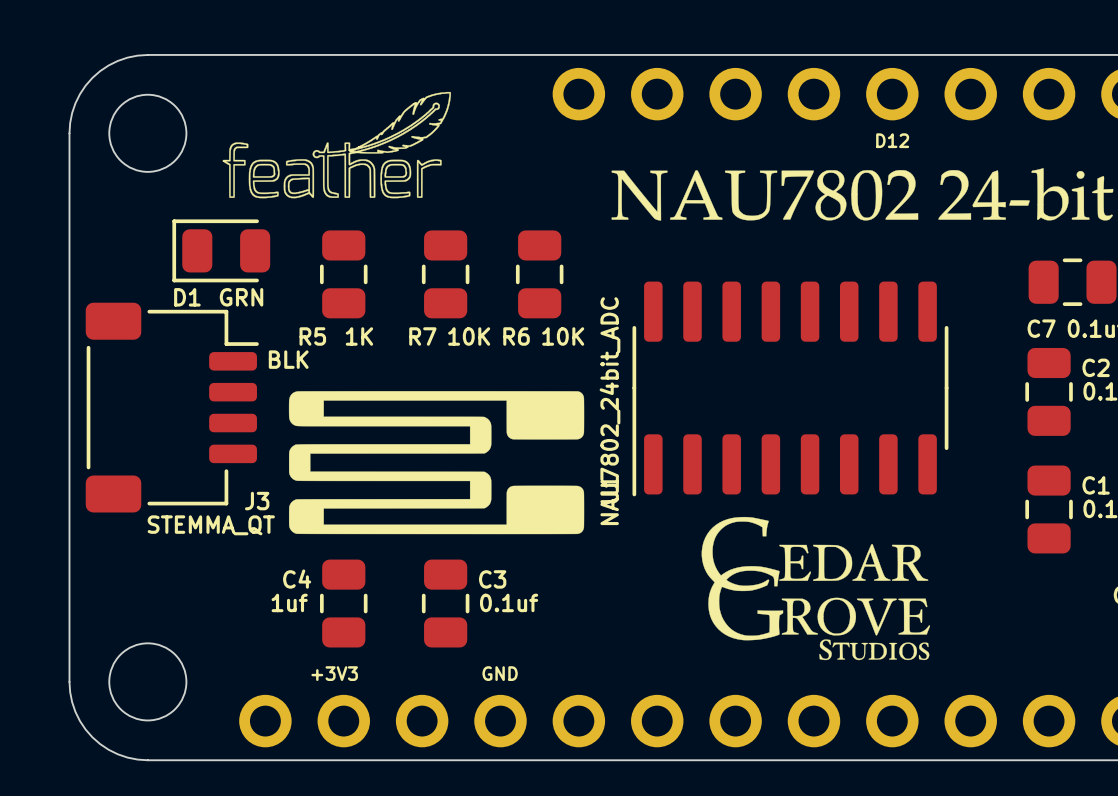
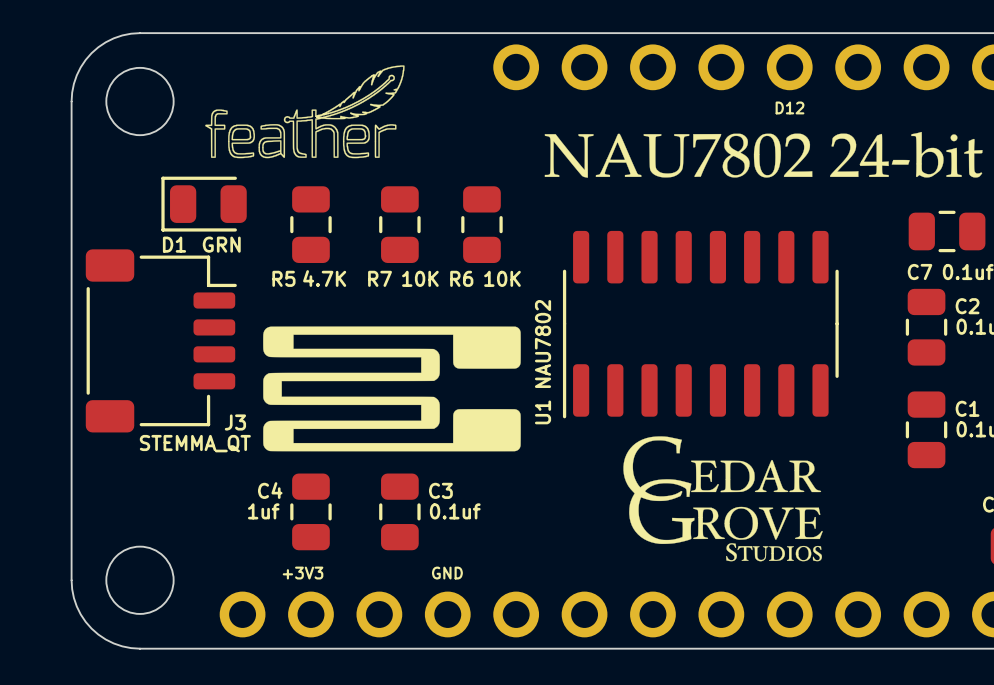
R5 value: 1K (359, 336) -> 4.7K (324, 278)
text: BLK (288, 359) -> none
U1 value: NAU7802_24bit_ADC (610, 411) -> NAU7802 (543, 344)

